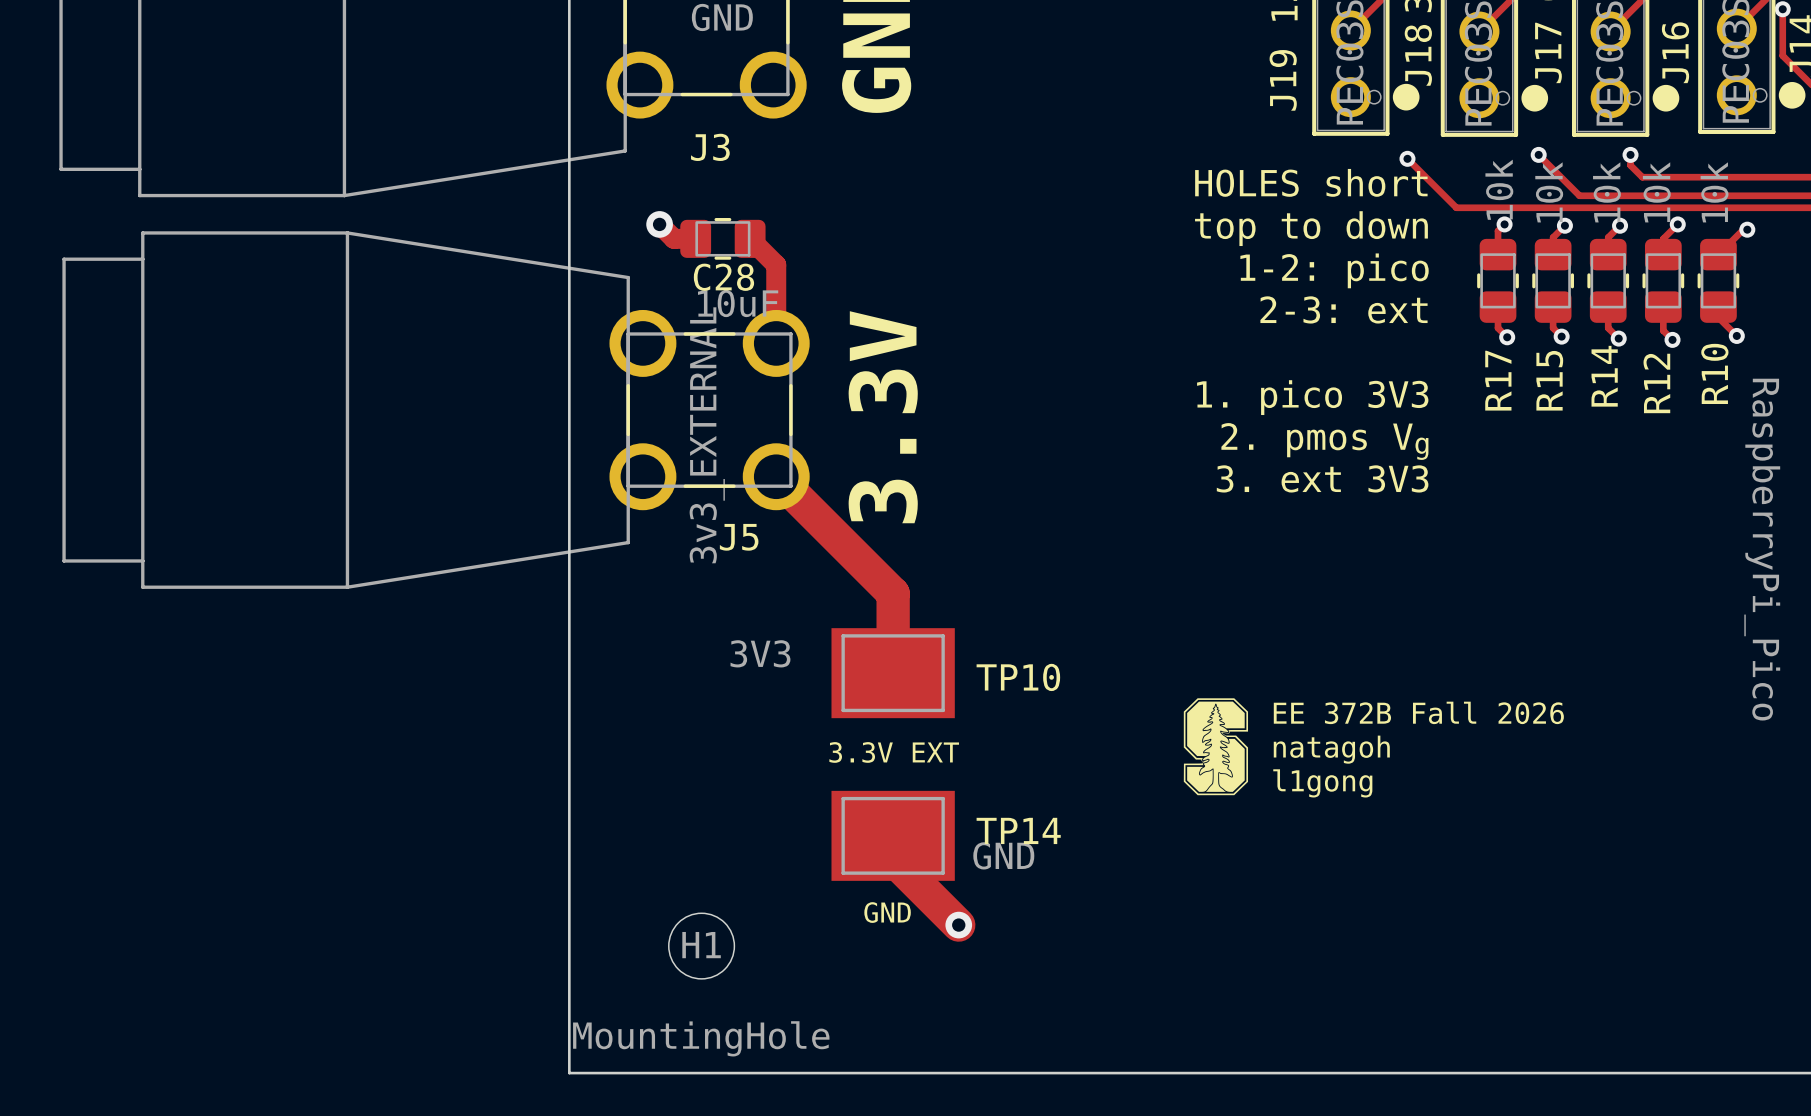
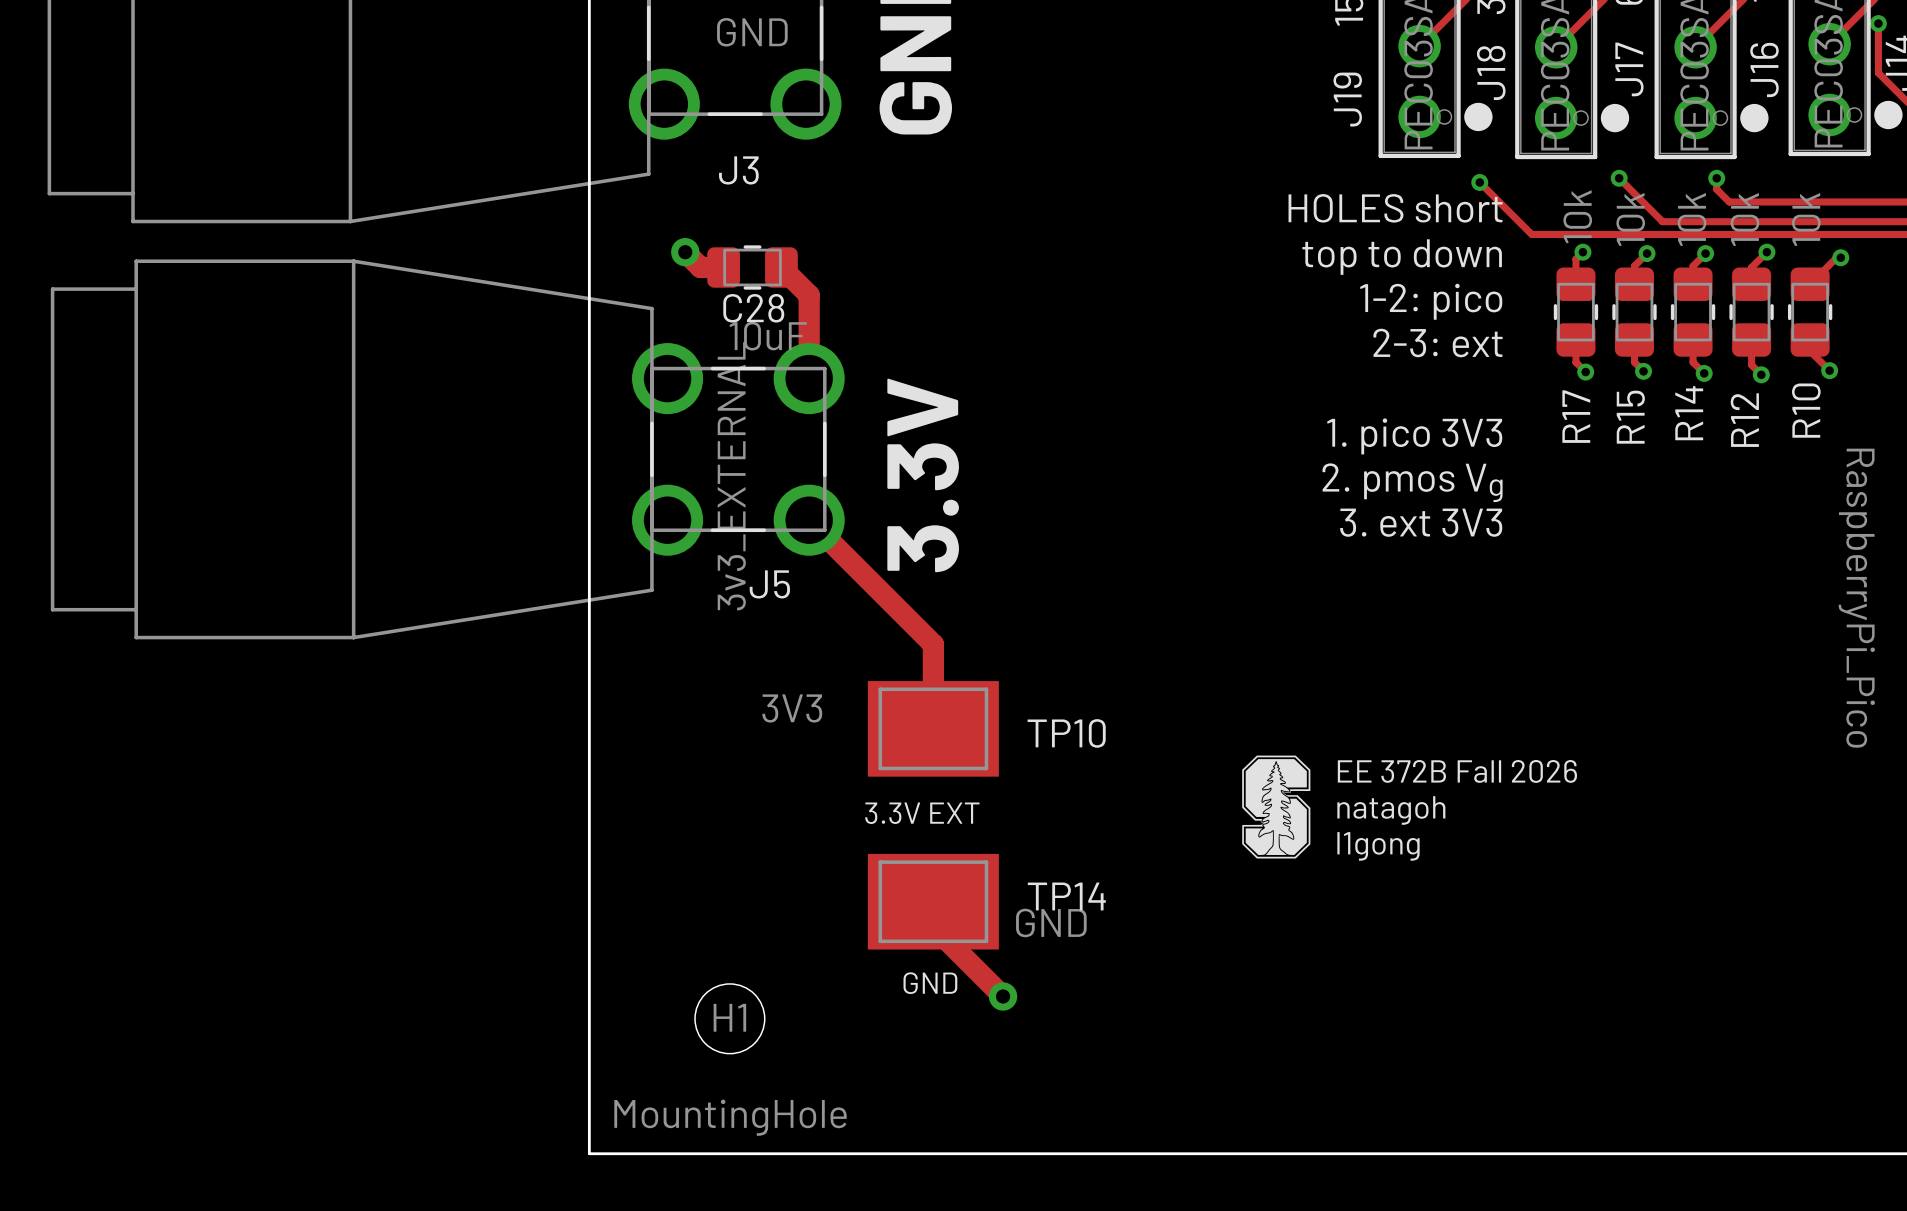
track width: thick (776, 476) (893, 593) (893, 673) -> thin (809, 520) (933, 644) (933, 728)
track width: thick (893, 859) (958, 925) -> thin (933, 926) (1003, 996)

